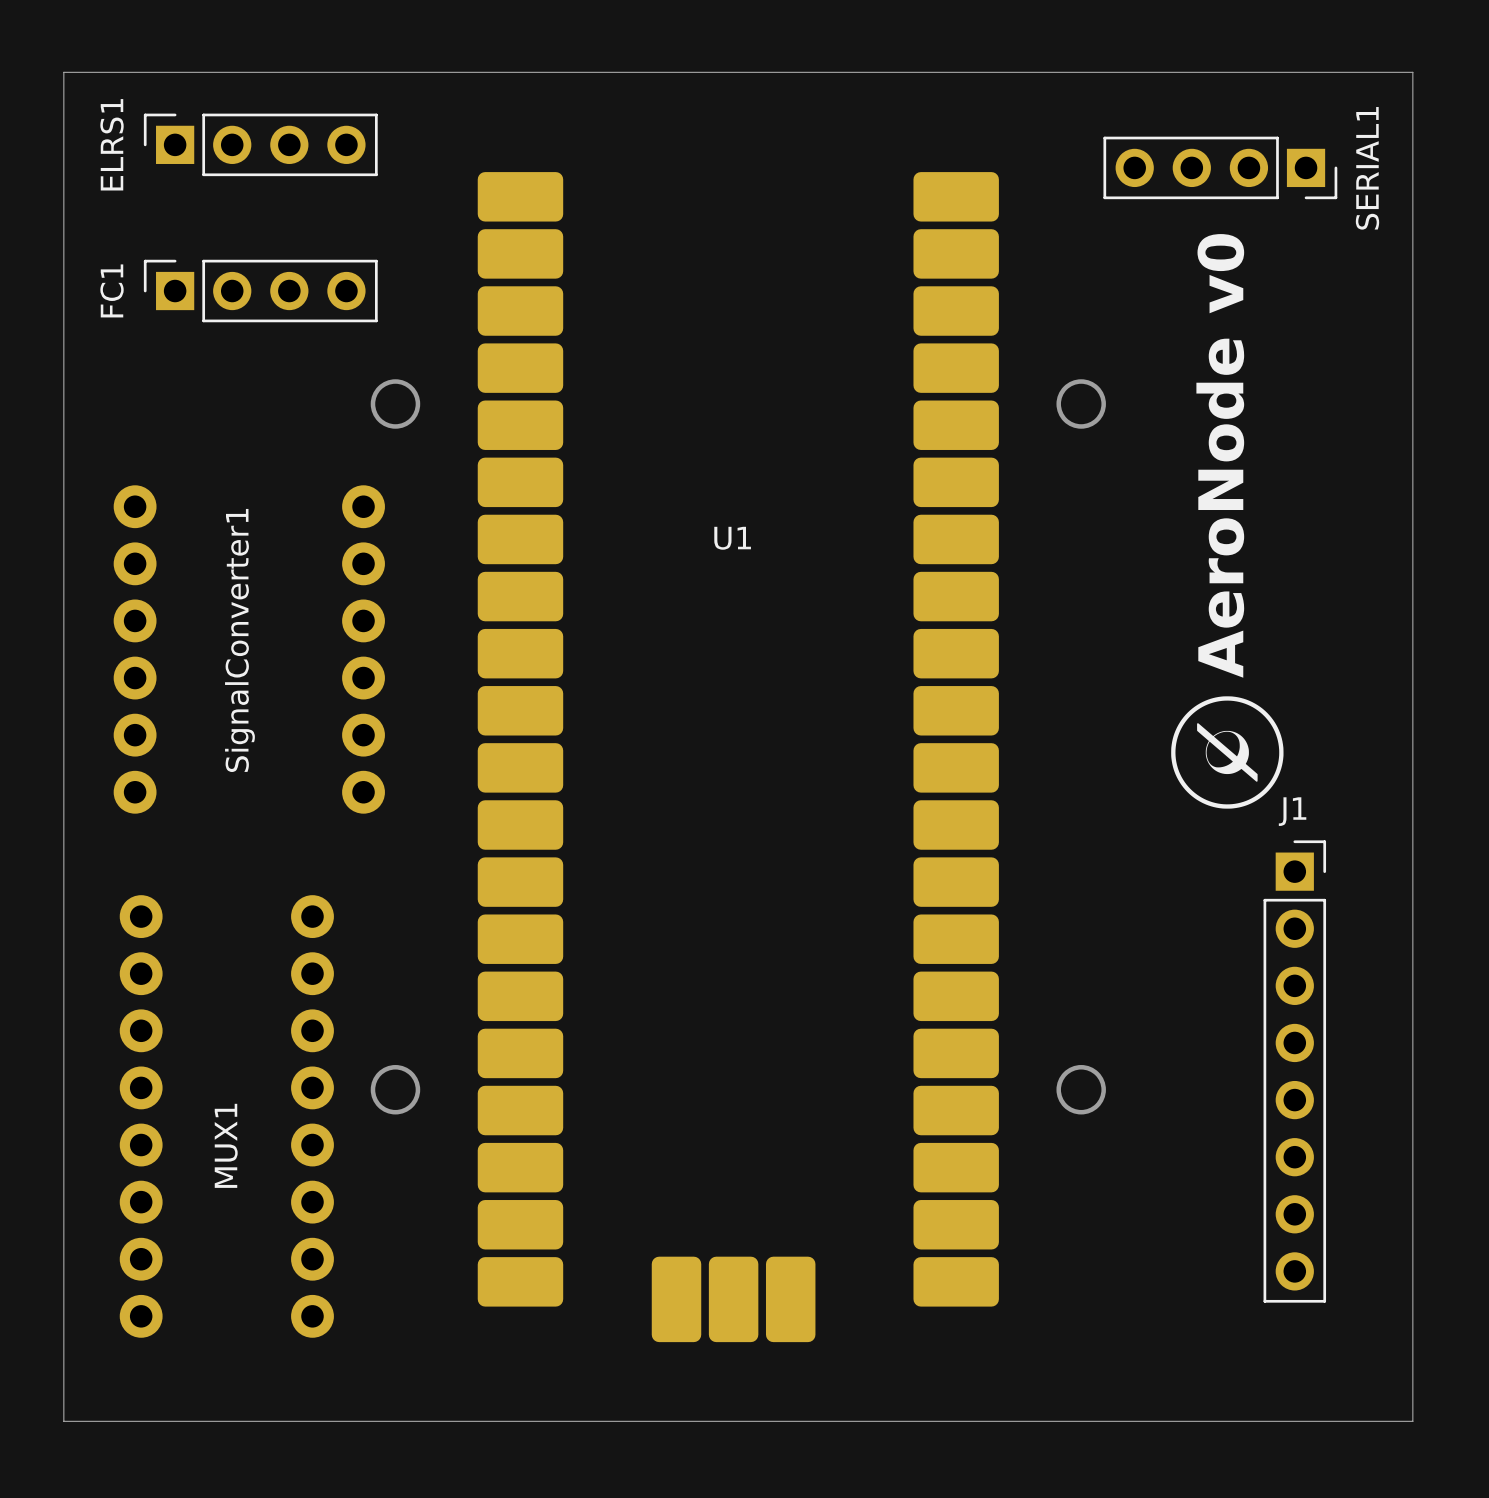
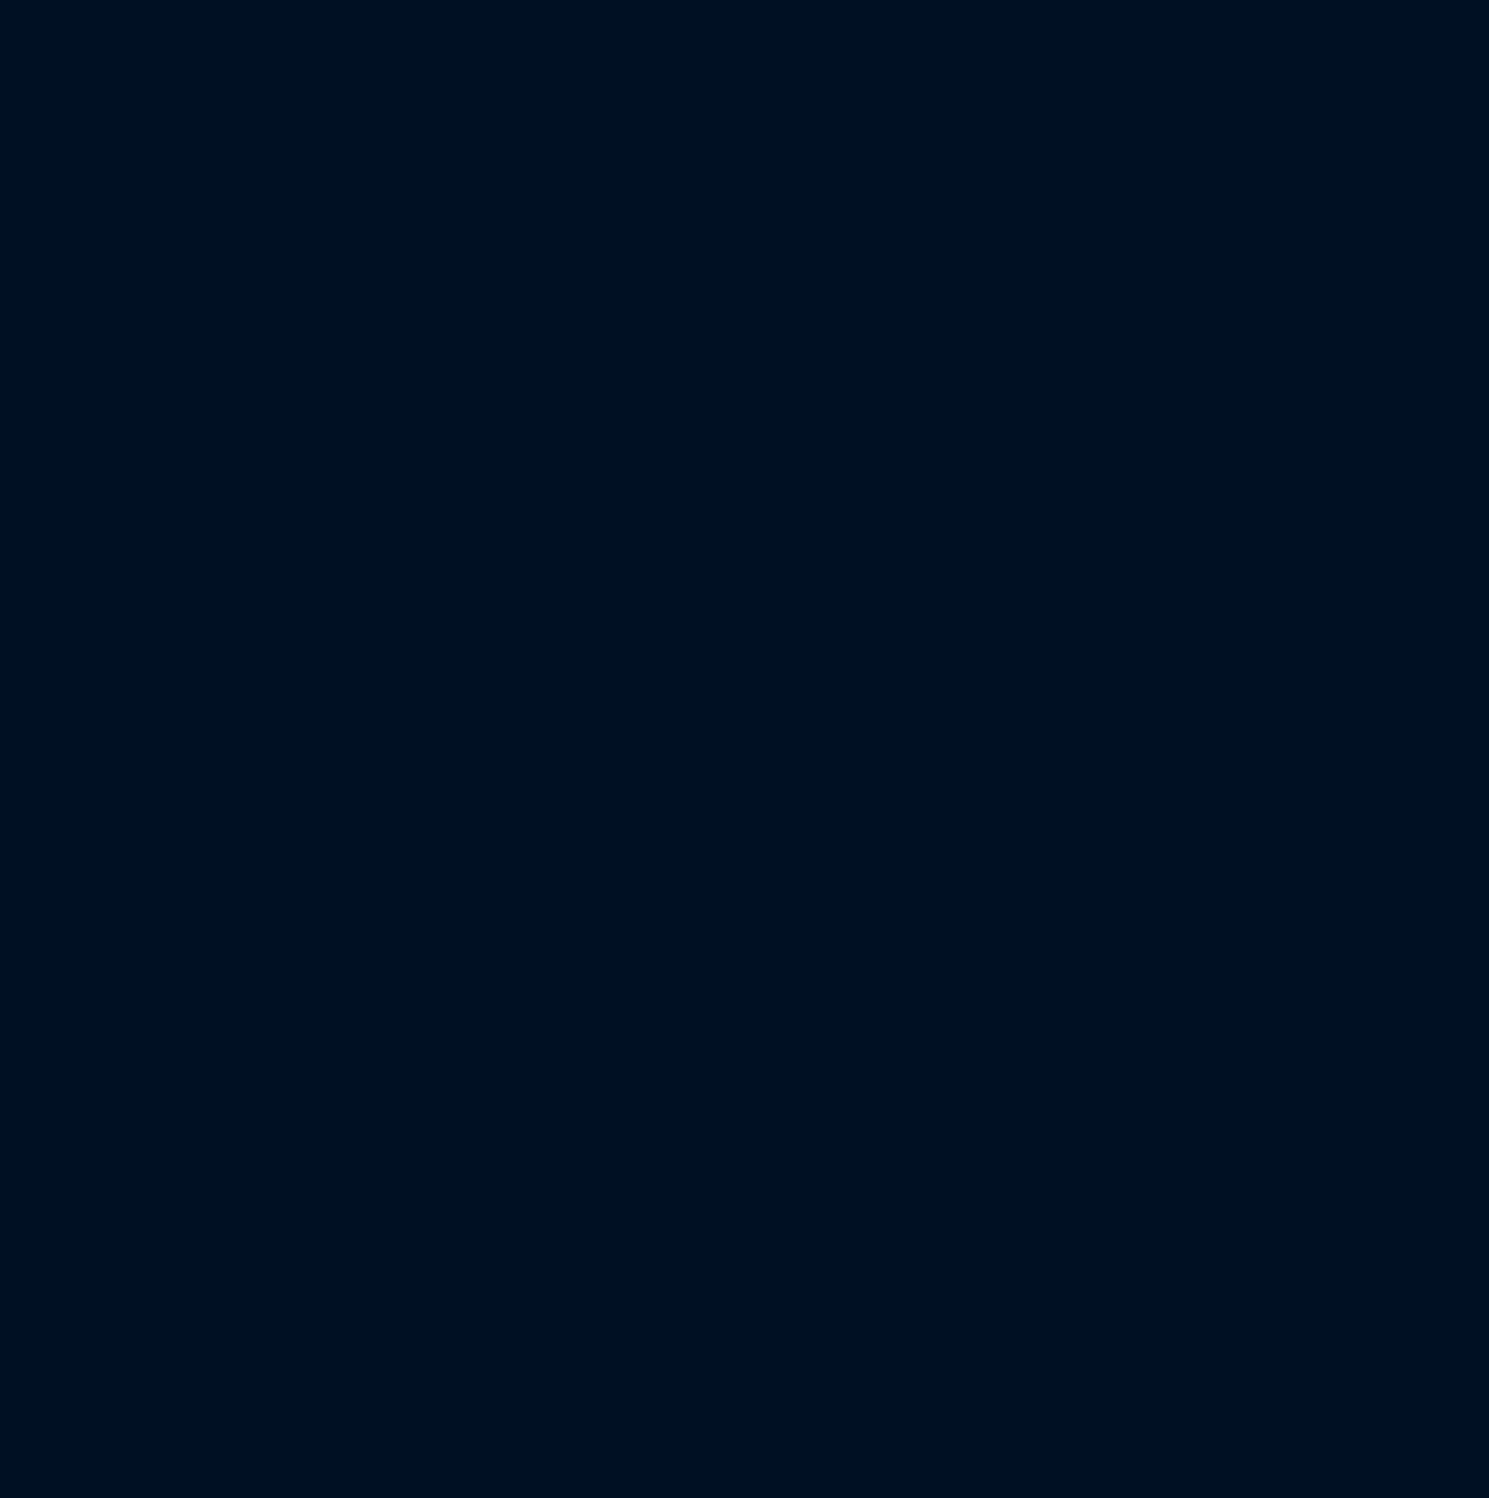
board edge: (63, 72) (1412, 72) (1412, 1421) (63, 1421) (63, 72) -> none
ELRS1: (260, 144) -> none
SERIAL1: (1220, 167) -> none
FC1: (260, 291) -> none
round board edge: [370, 379, 421, 429] -> none
round board edge: [1056, 379, 1106, 429] -> none
text: AeroNode v0 (1220, 455) -> none
SignalConverter1: (249, 649) -> none
drawing: [1171, 696, 1284, 809] -> none
U1: (738, 757) -> none
round board edge: [370, 1065, 421, 1115] -> none
round board edge: [1056, 1065, 1106, 1115] -> none
J1: (1294, 1071) -> none
MUX1: (226, 1116) -> none

